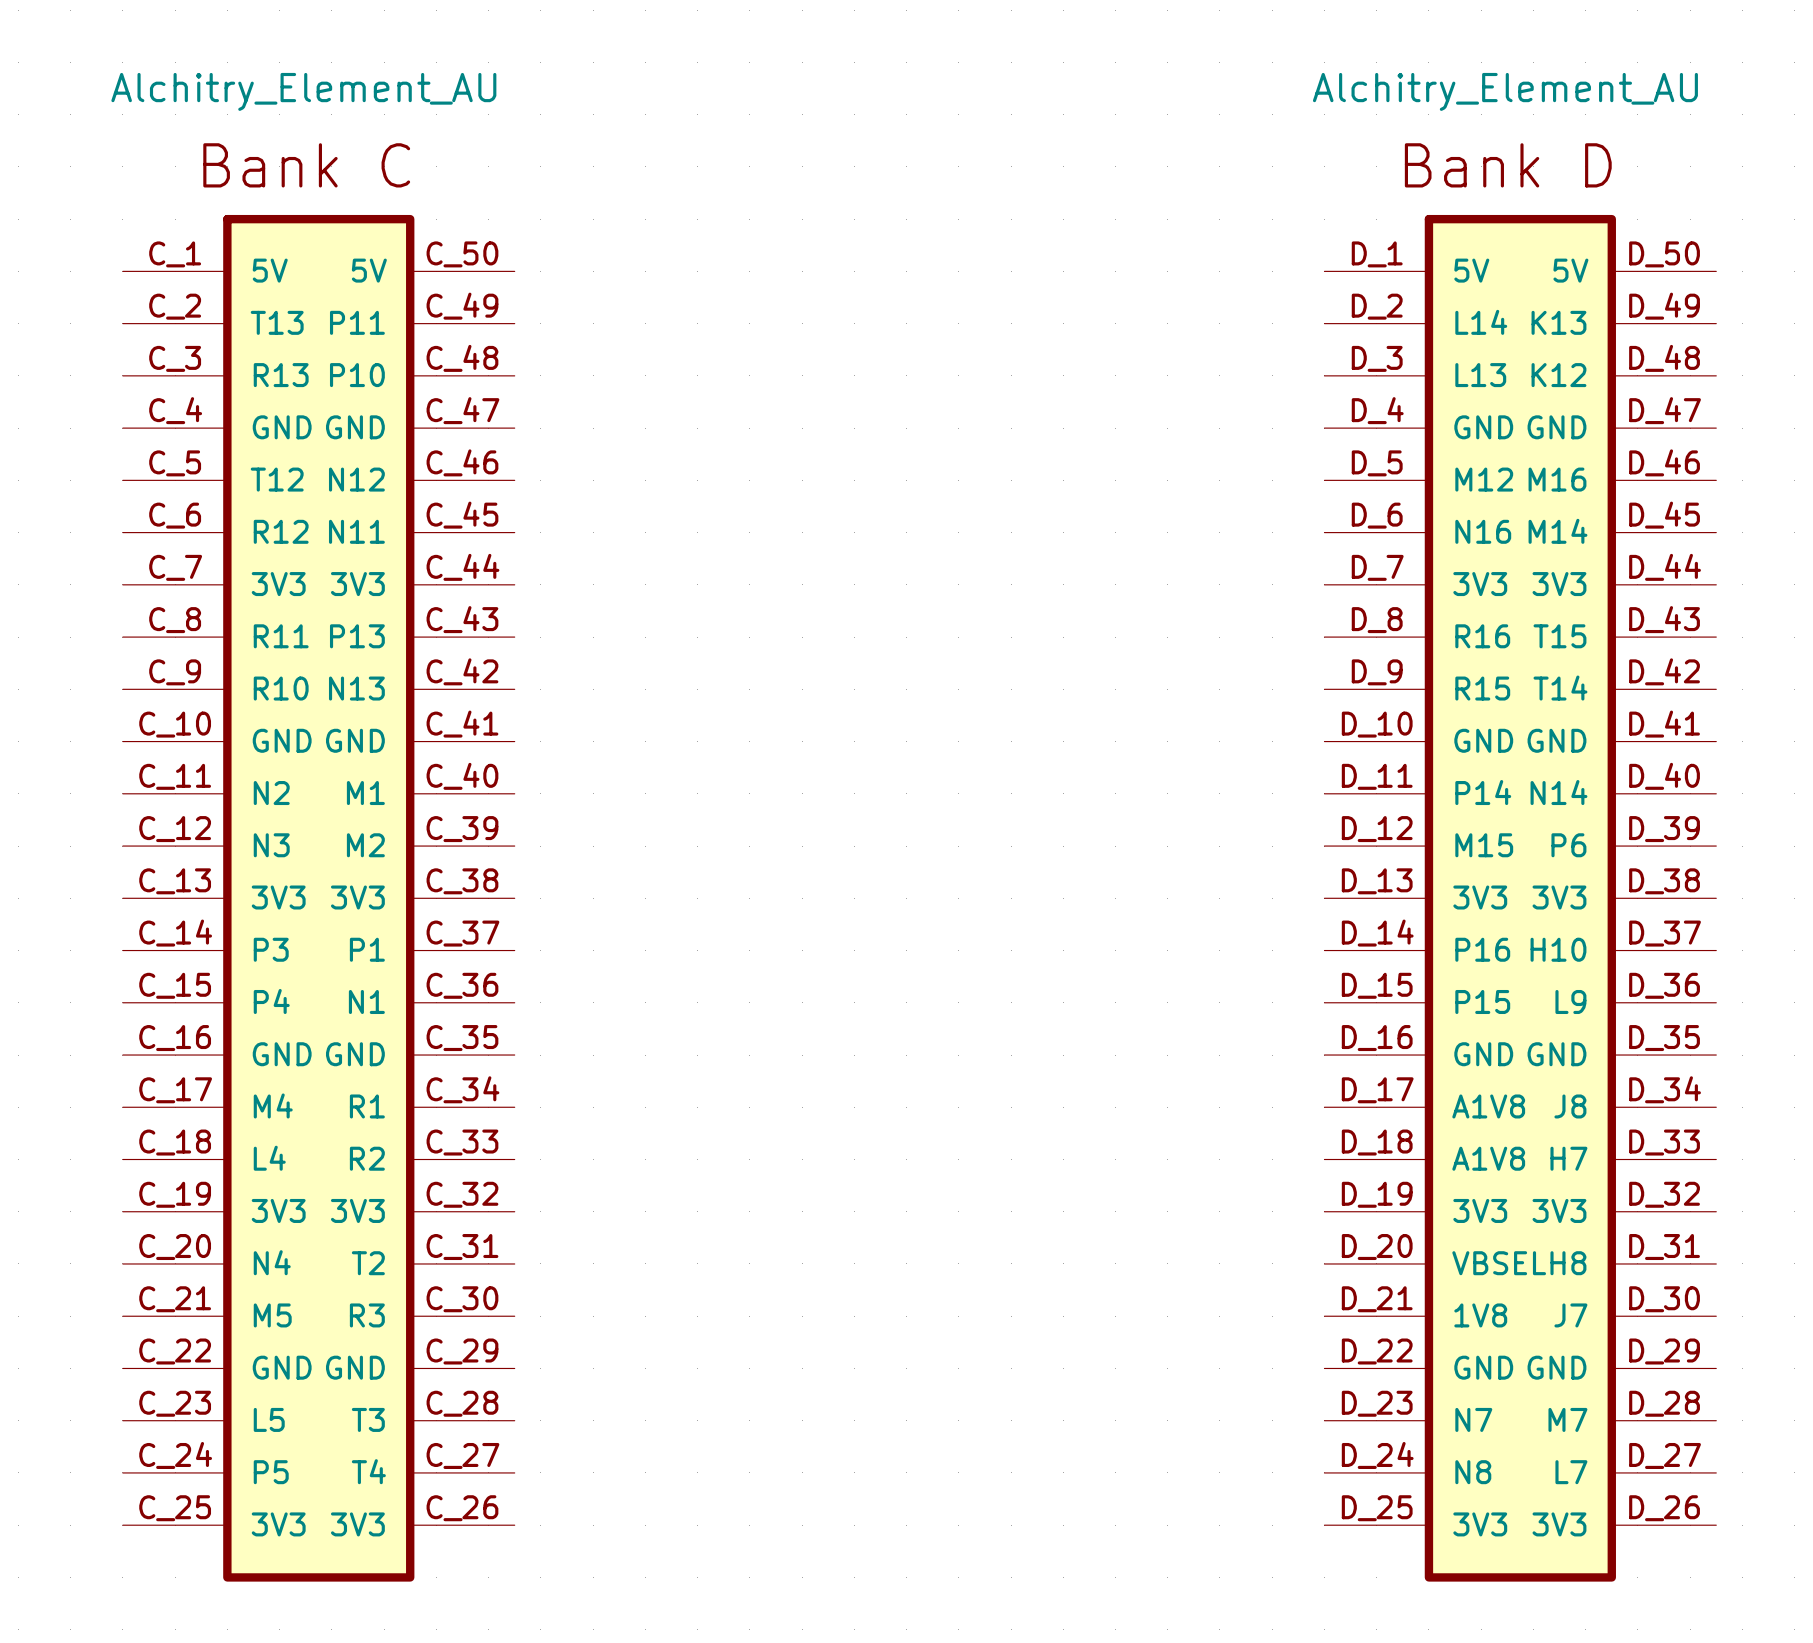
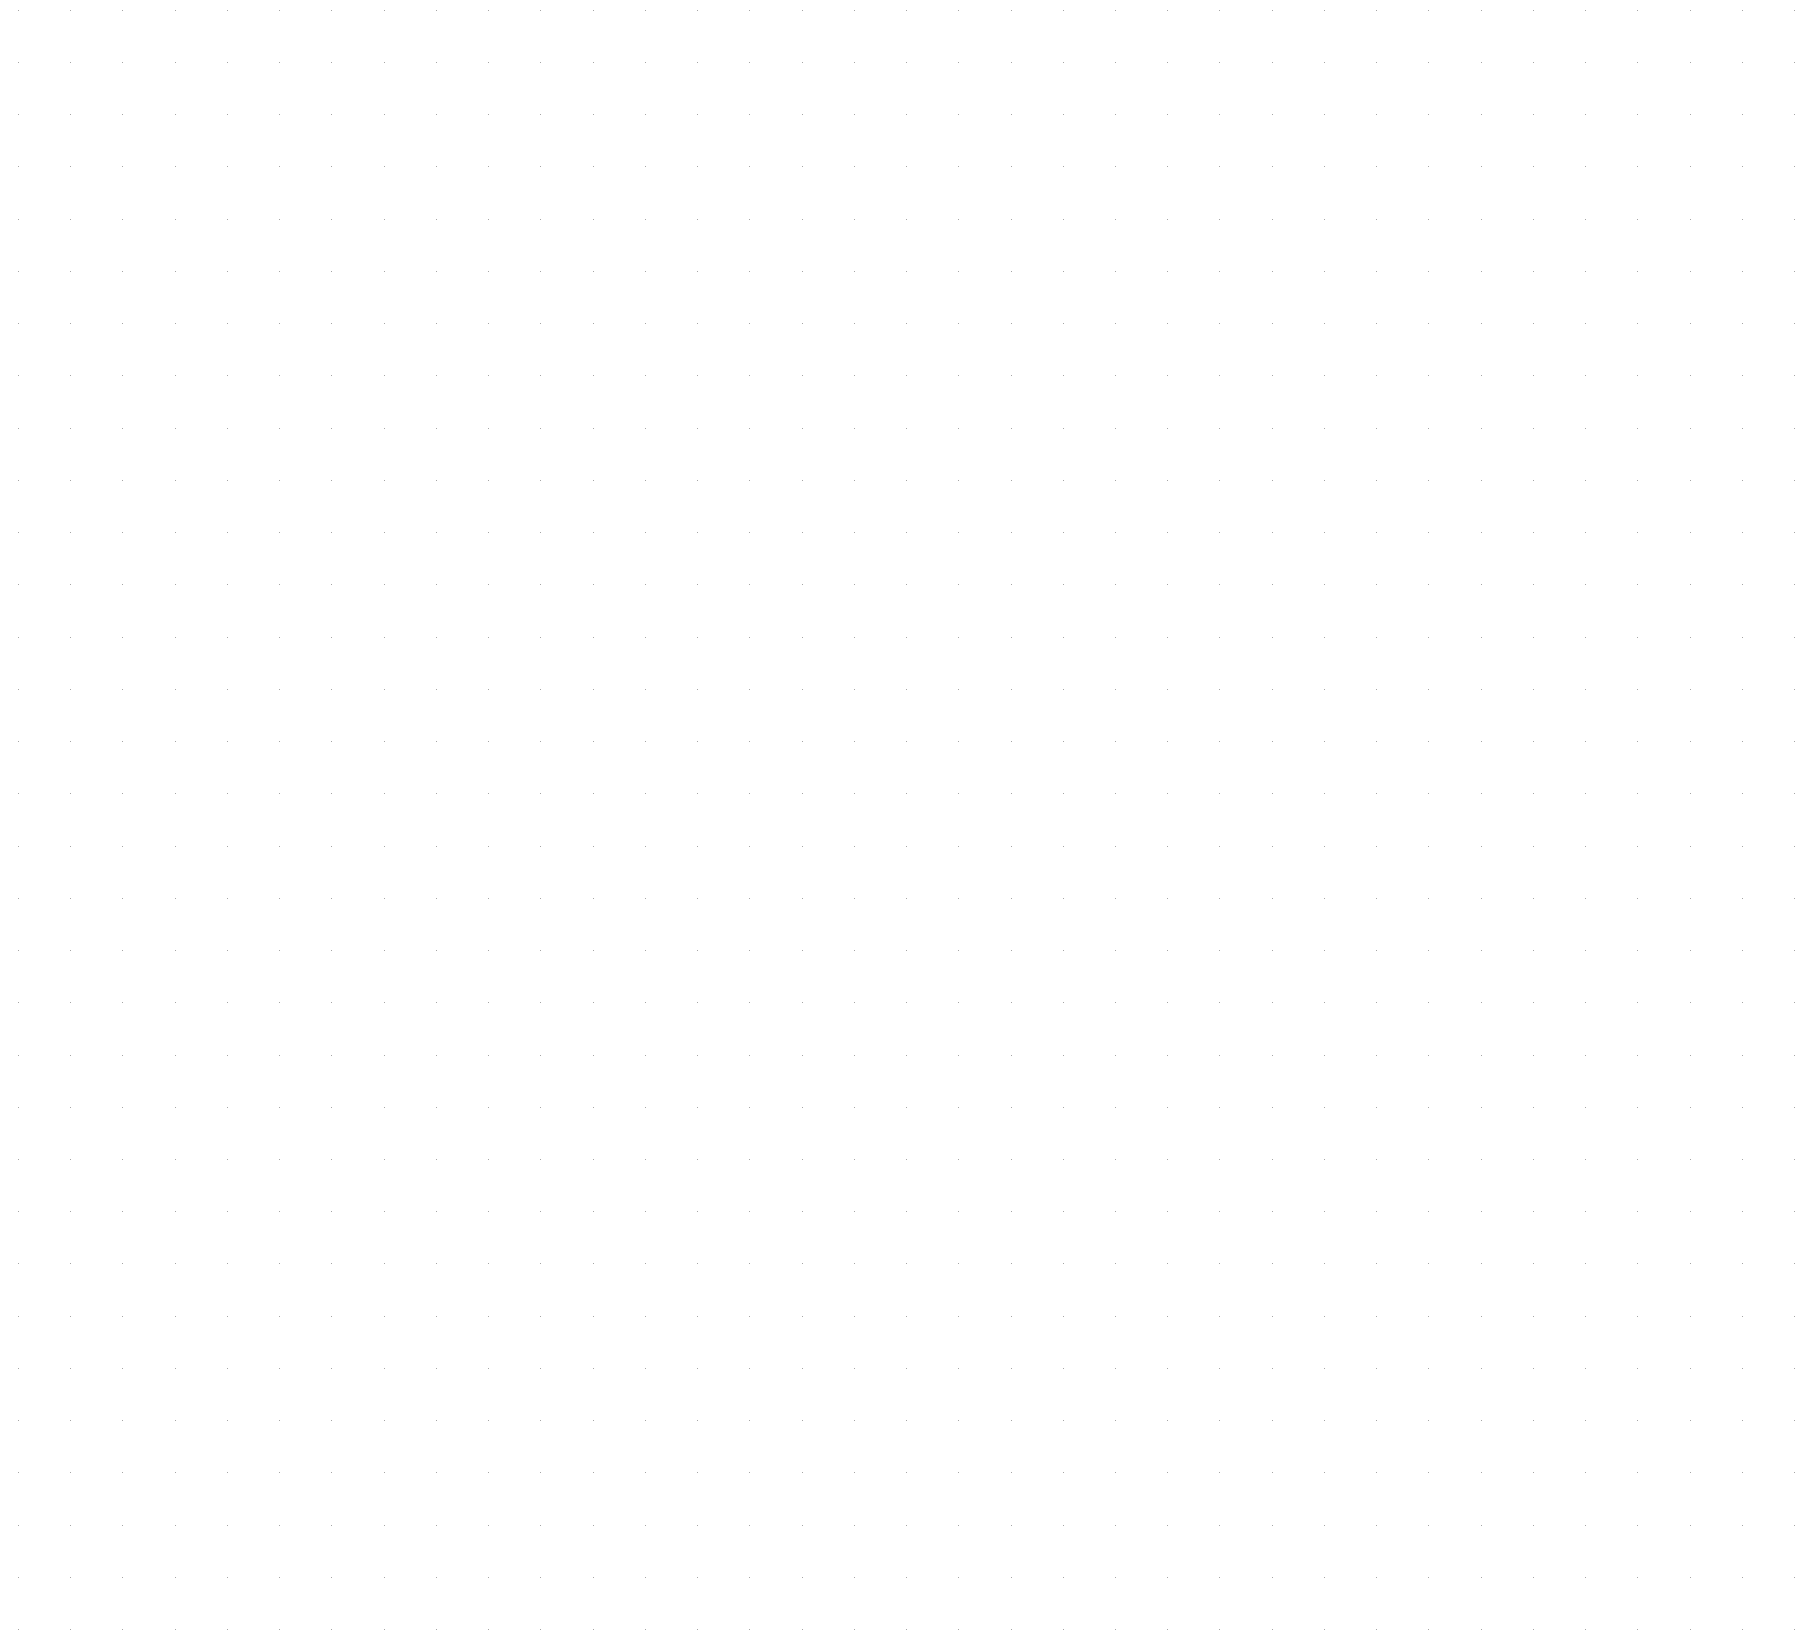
part: Alchitry_Element_AU (318, 898) -> none
part: Alchitry_Element_AU (1520, 898) -> none

